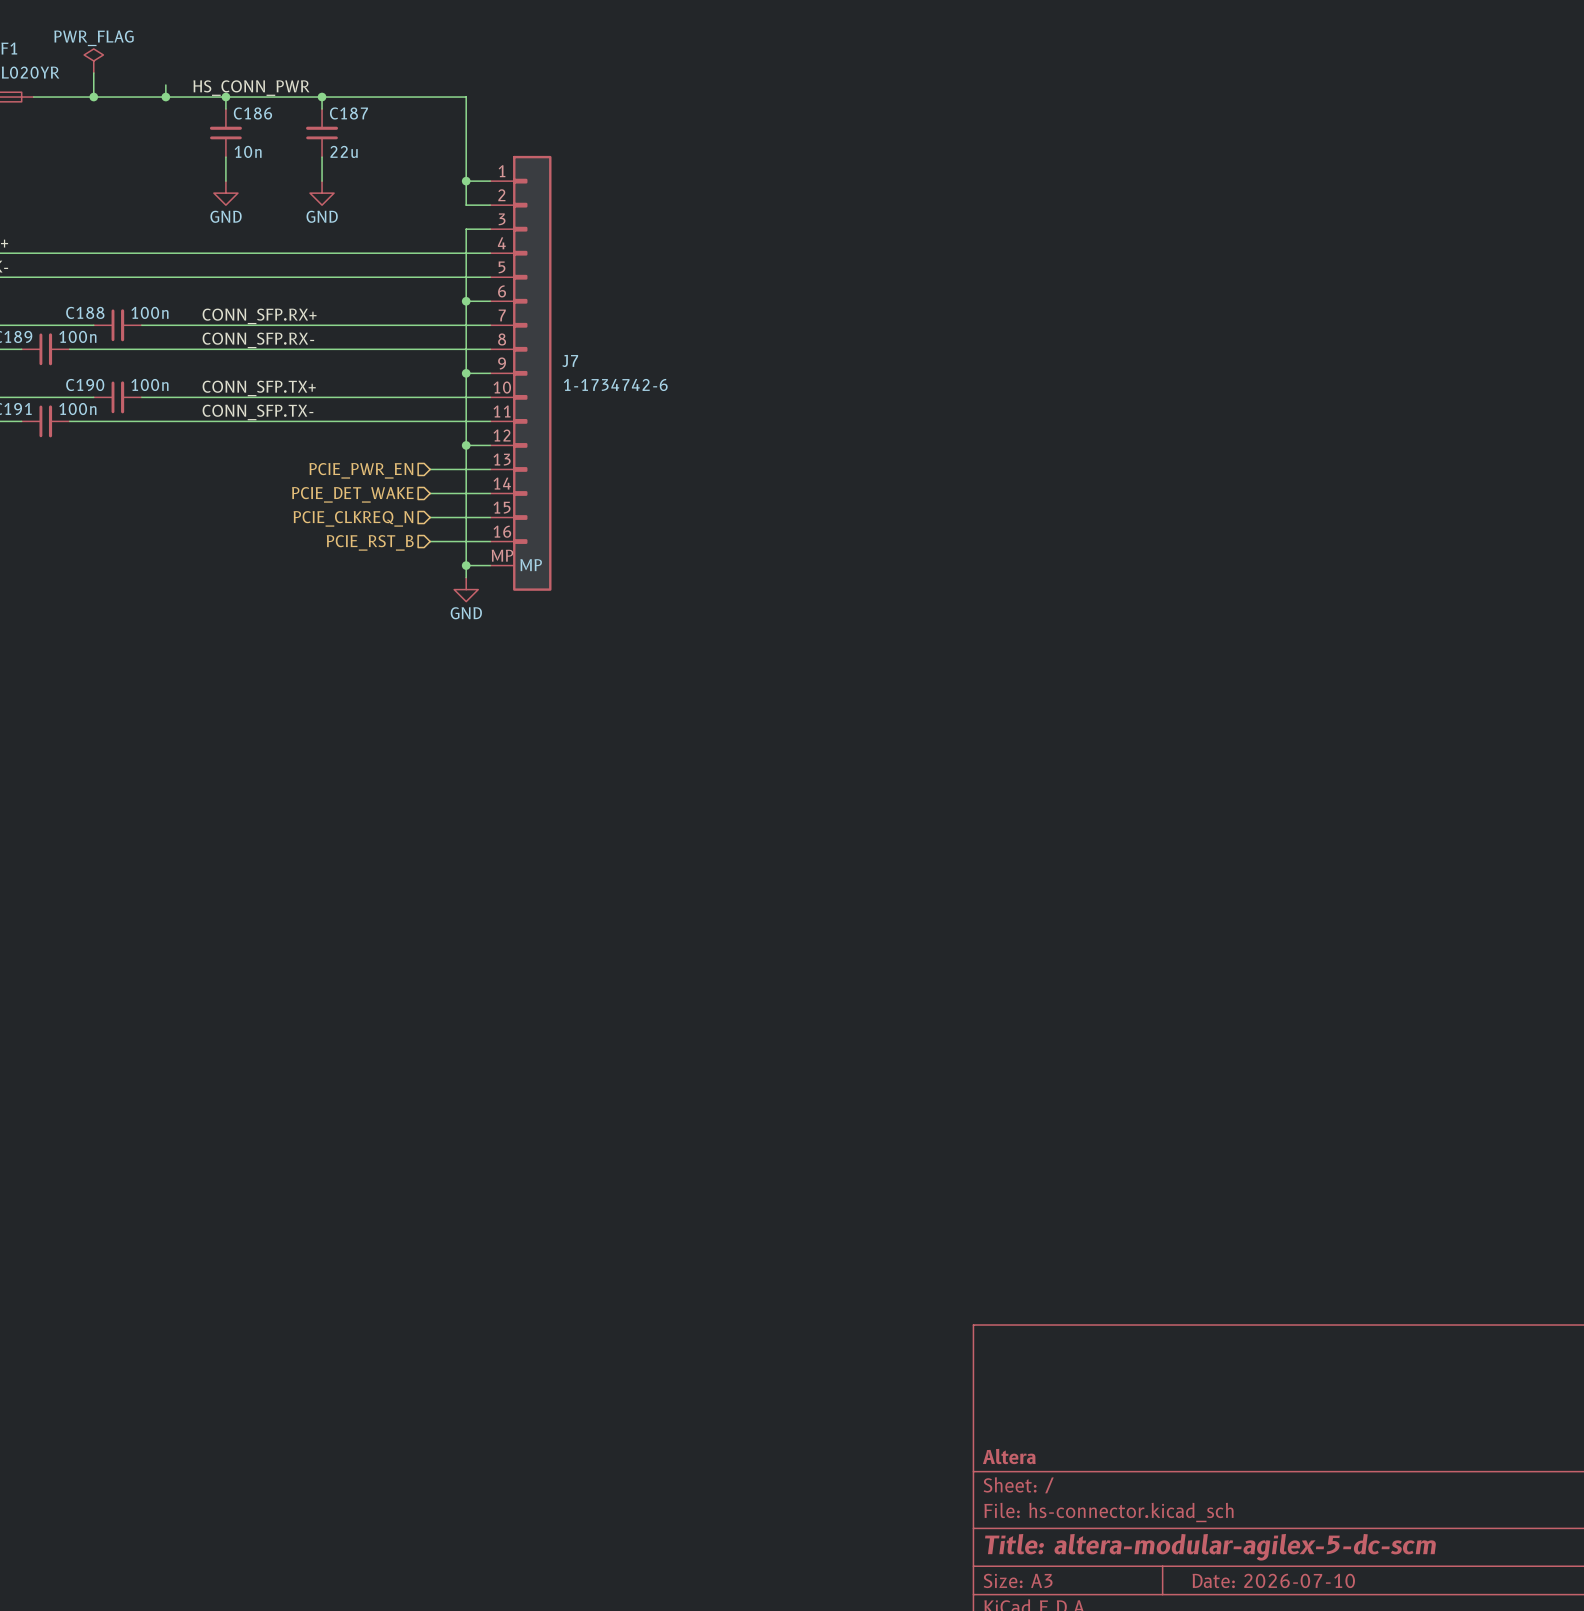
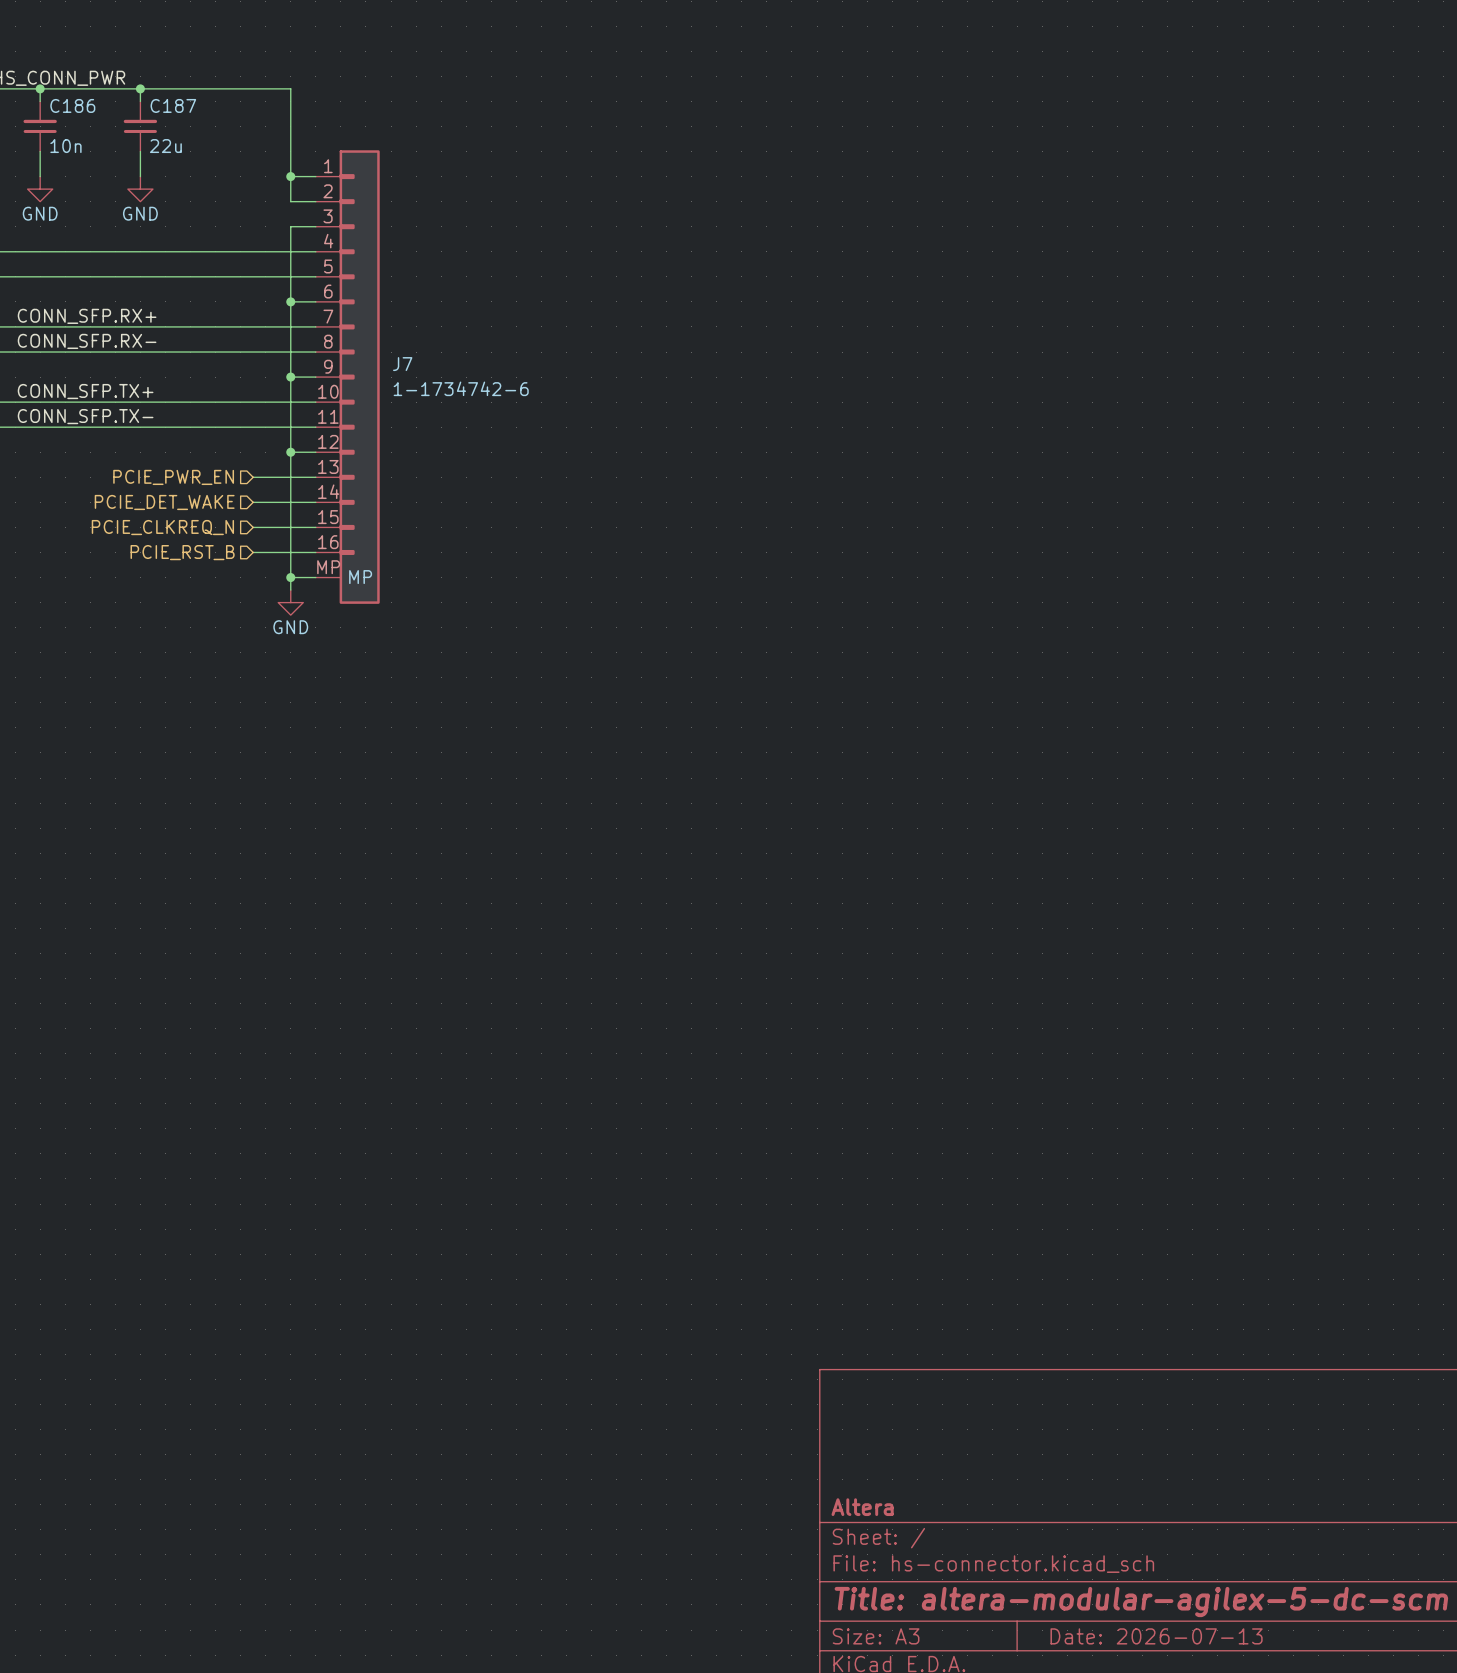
title block: Date: 2026-07-10 (1273, 1580) -> Date: 2026-07-13 (1156, 1636)

